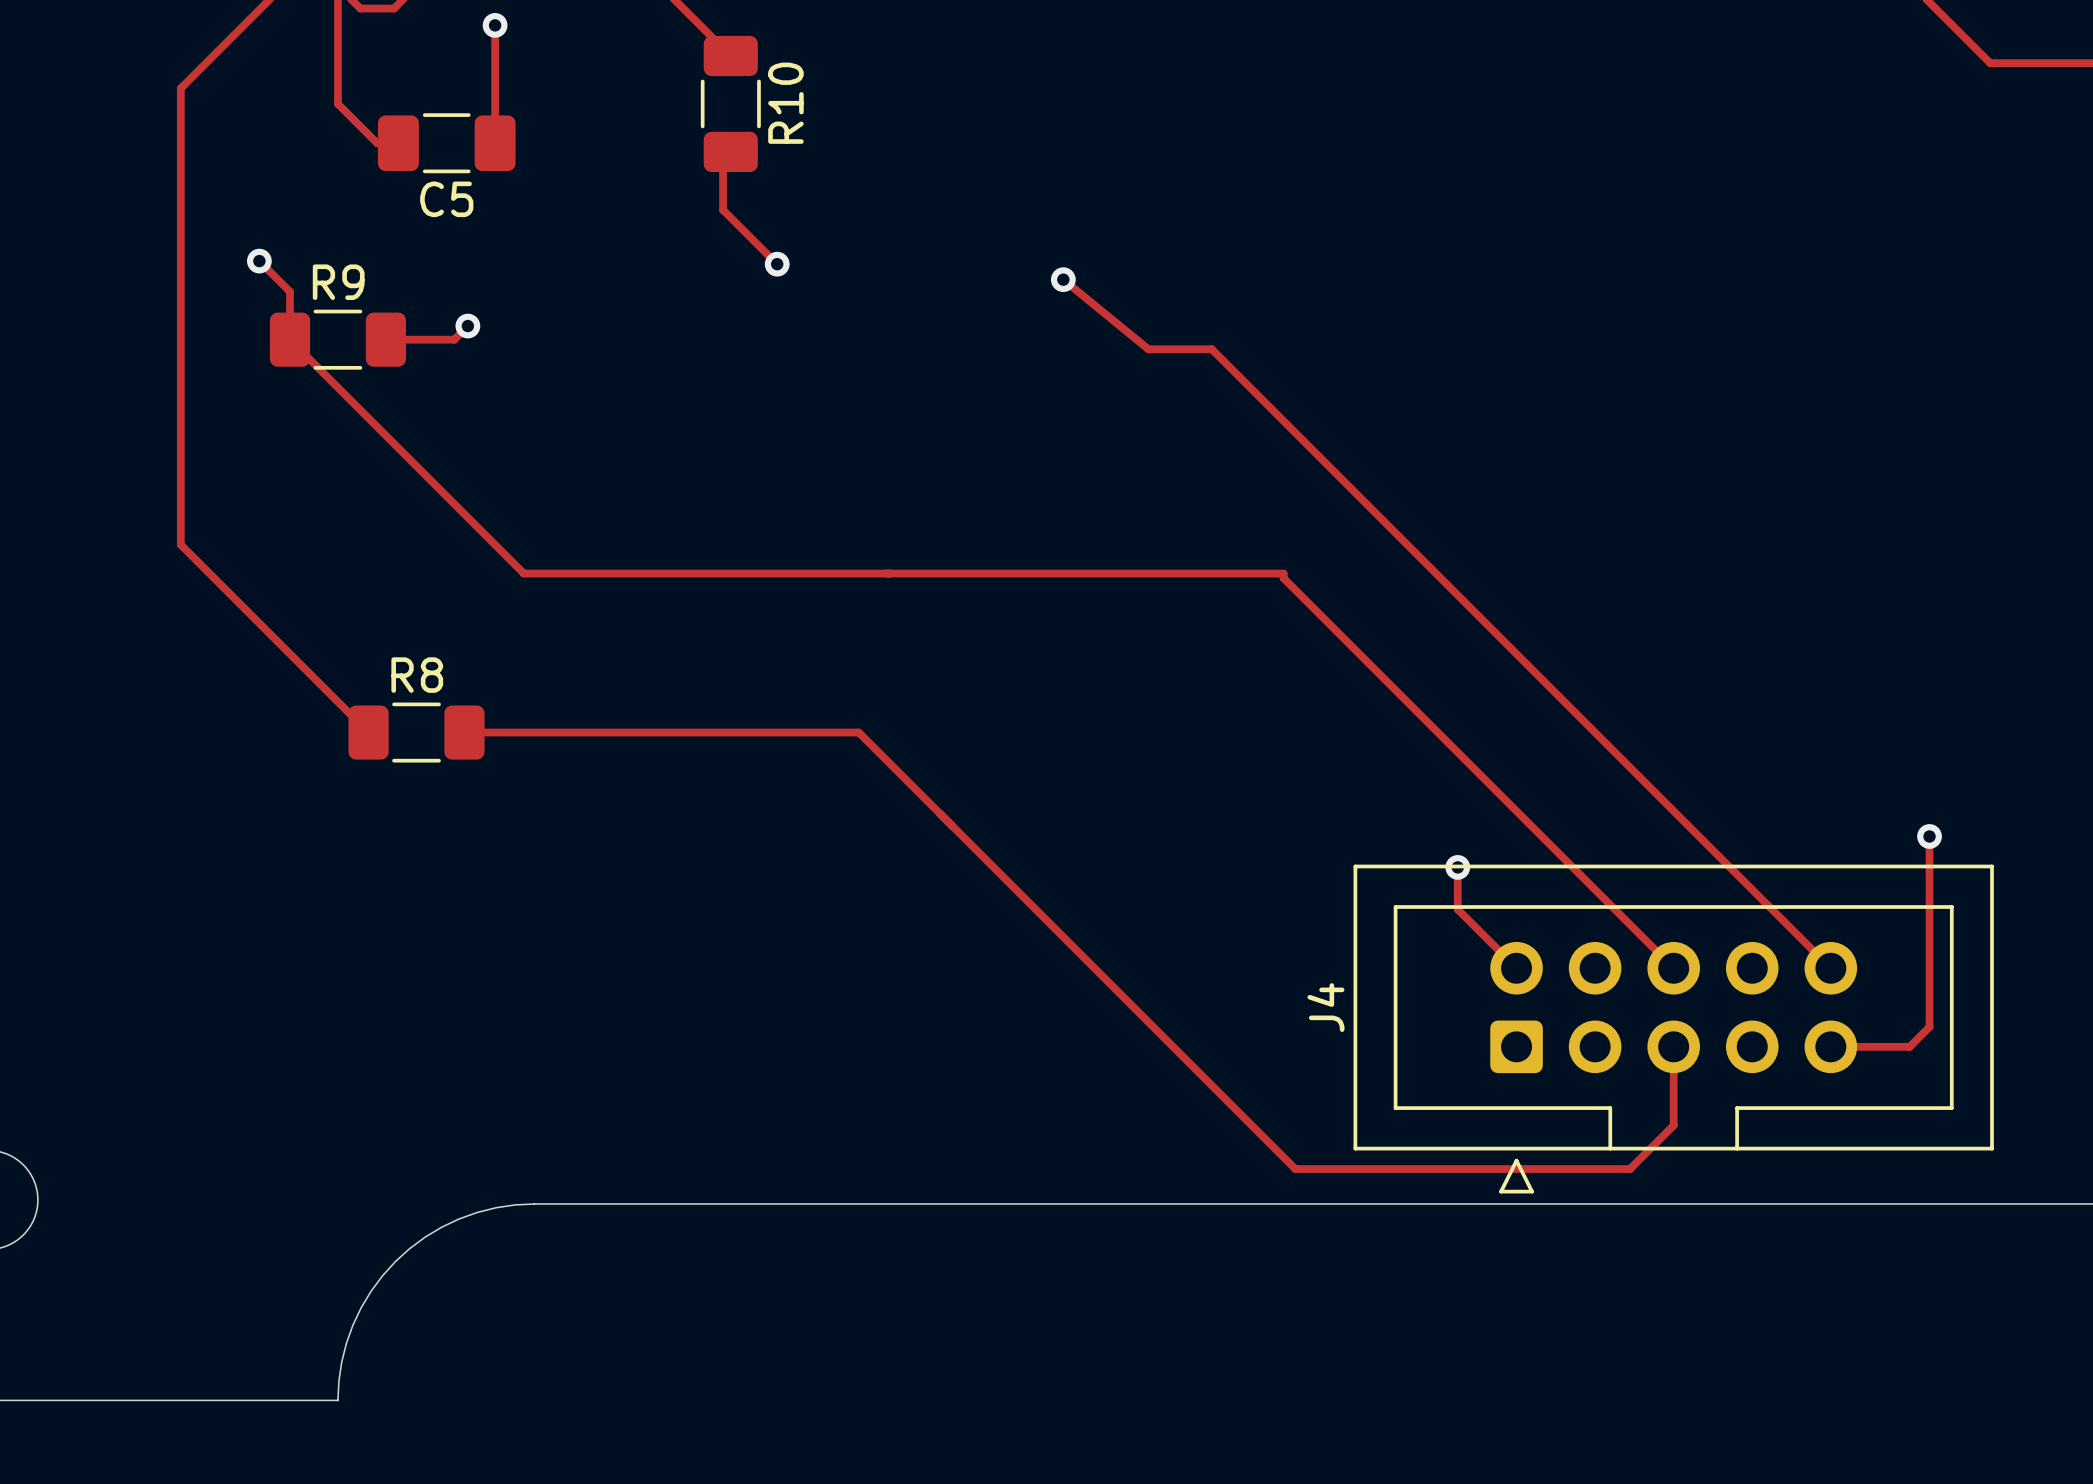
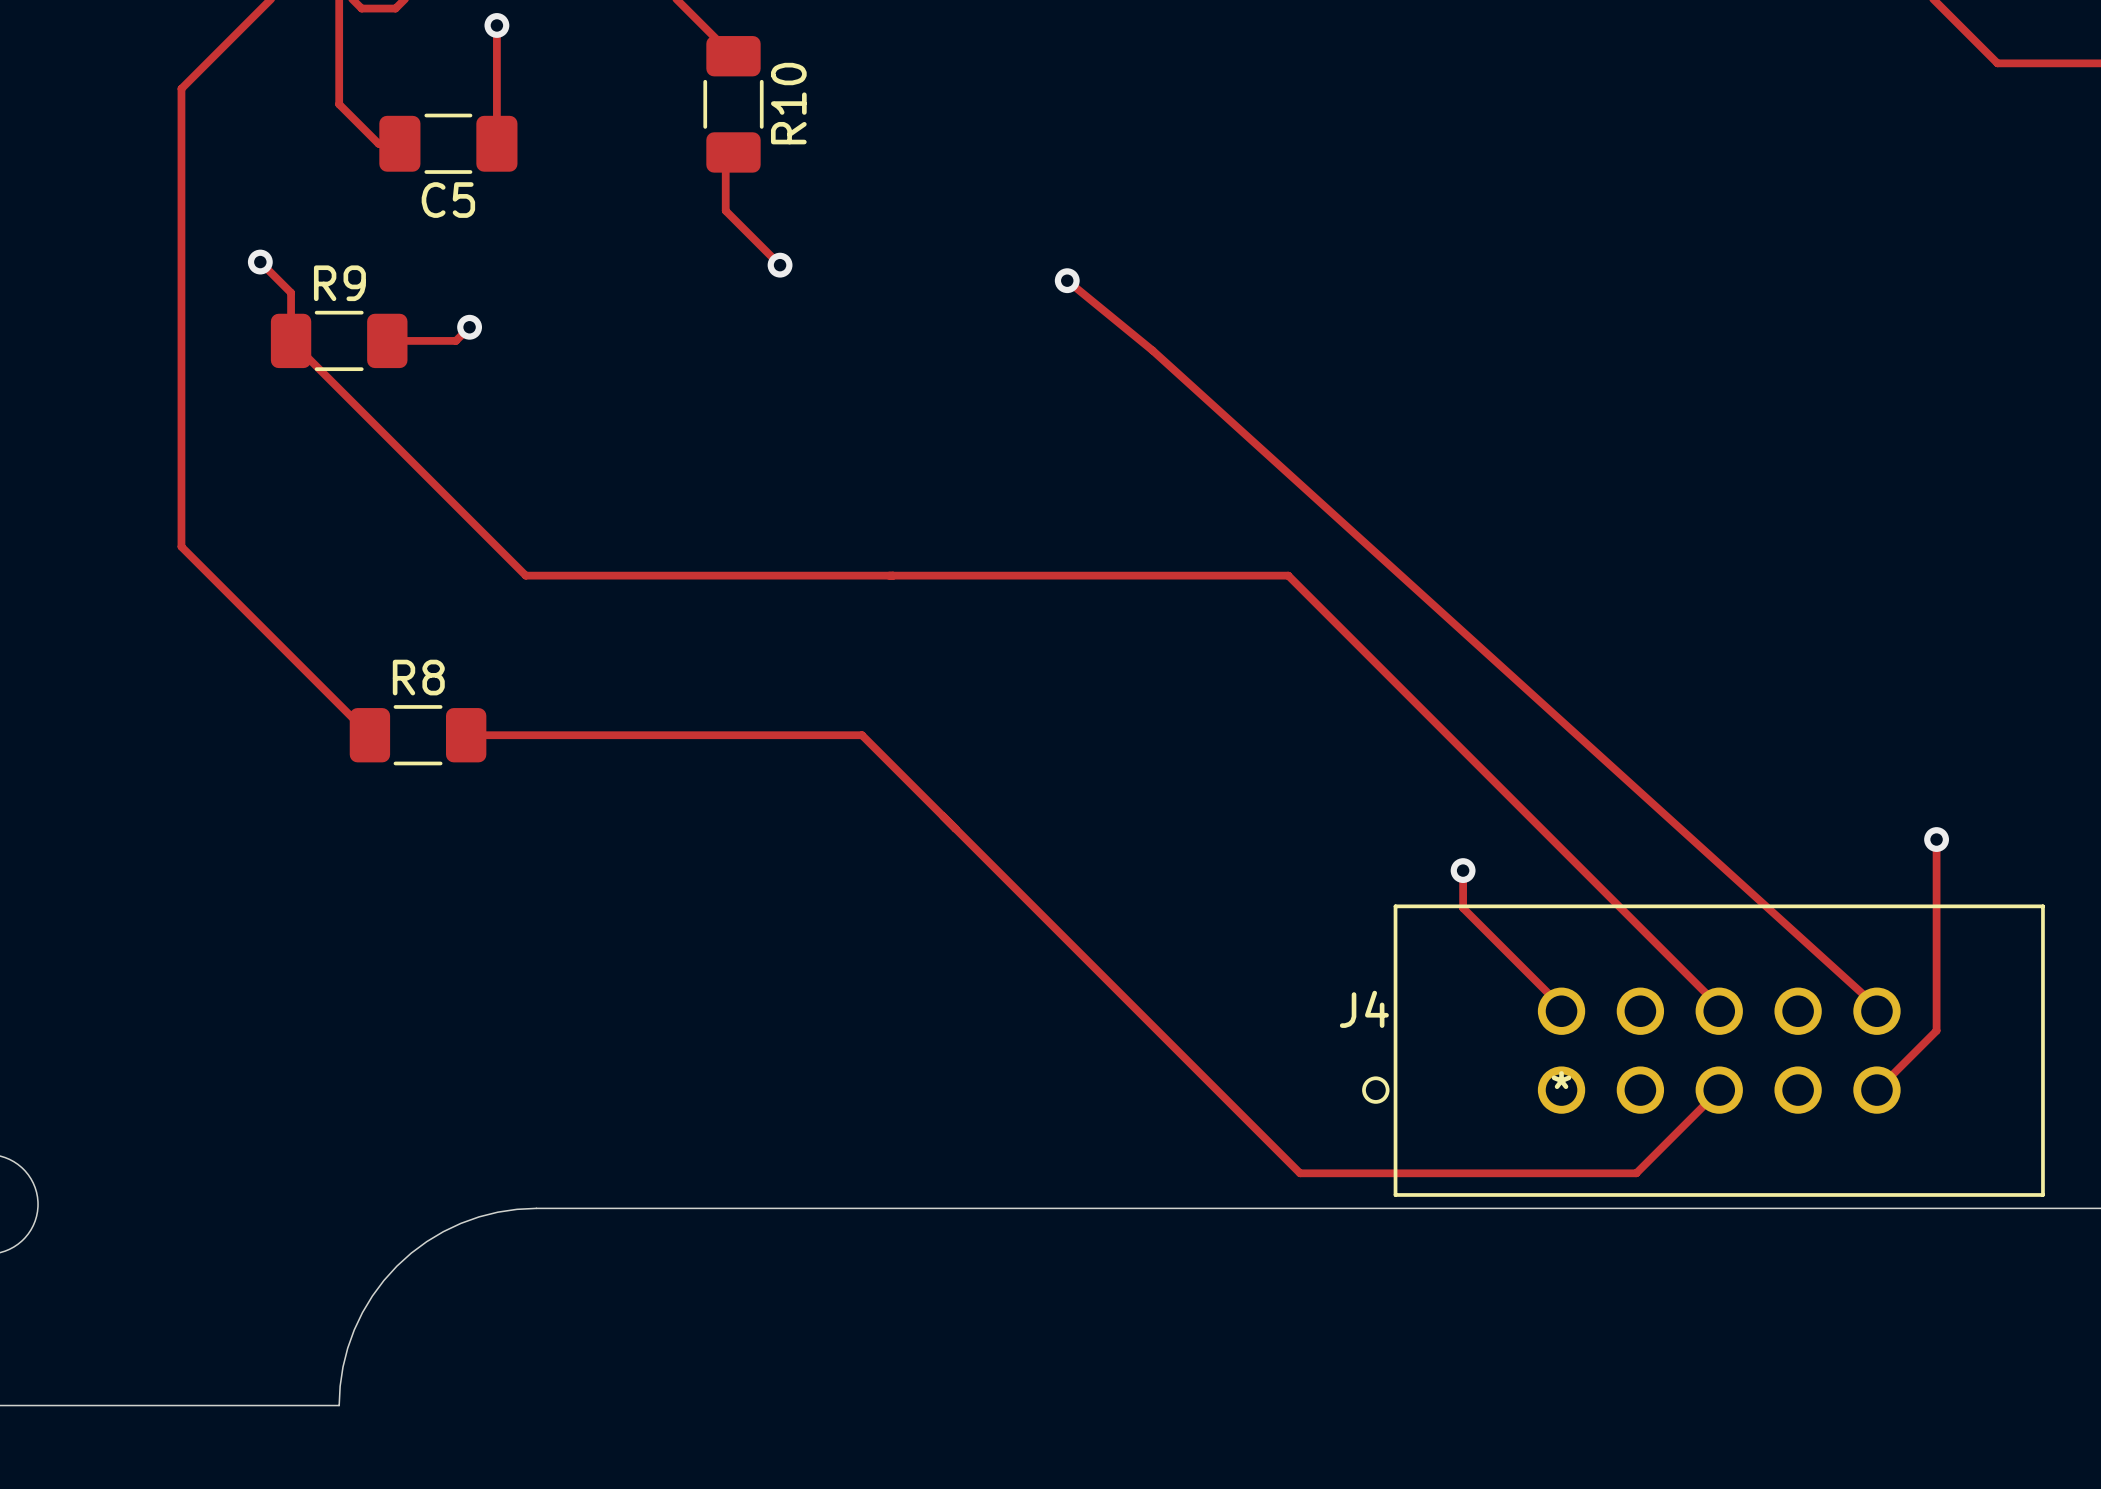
track: (1148, 349) (1211, 349) (1830, 968) -> (1152, 350) (1879, 1009)
track: (1283, 573) (1283, 578) (1673, 968) -> (1288, 575) (1721, 1009)
J4 footprint: [1353, 864, 1994, 1194] -> [1362, 904, 2045, 1197]
track: (1457, 904) (1457, 909) (1516, 968) -> (1463, 908) (1564, 1009)
track: (1673, 1046) (1673, 1125) (1630, 1169) -> (1721, 1087) (1636, 1173)
track: (1830, 1046) (1909, 1046) -> (1879, 1087) (1916, 1050)

